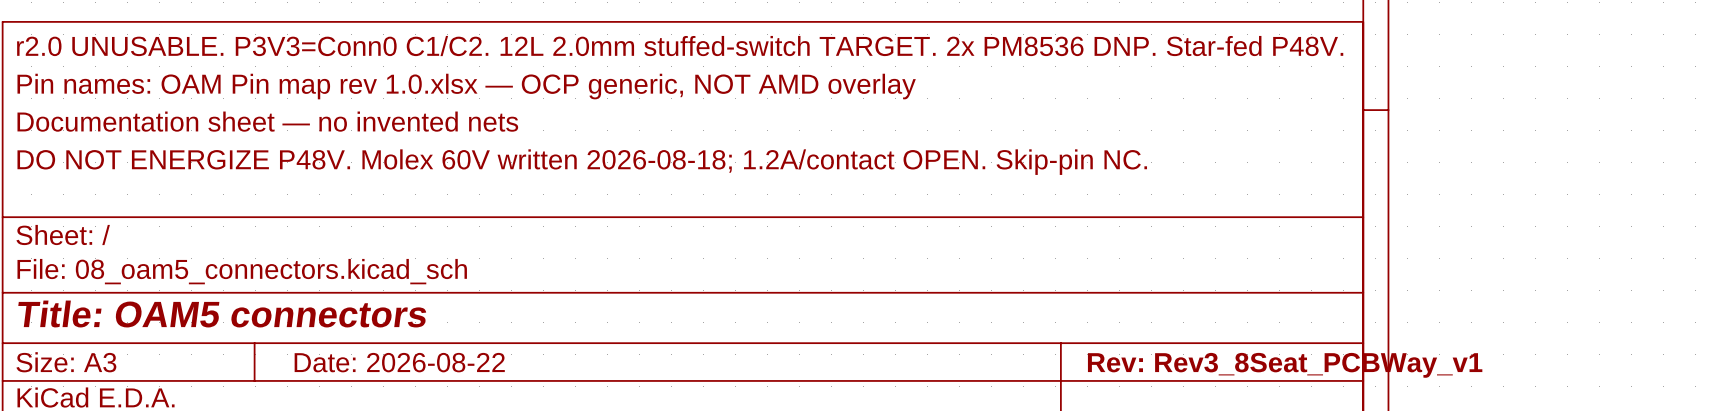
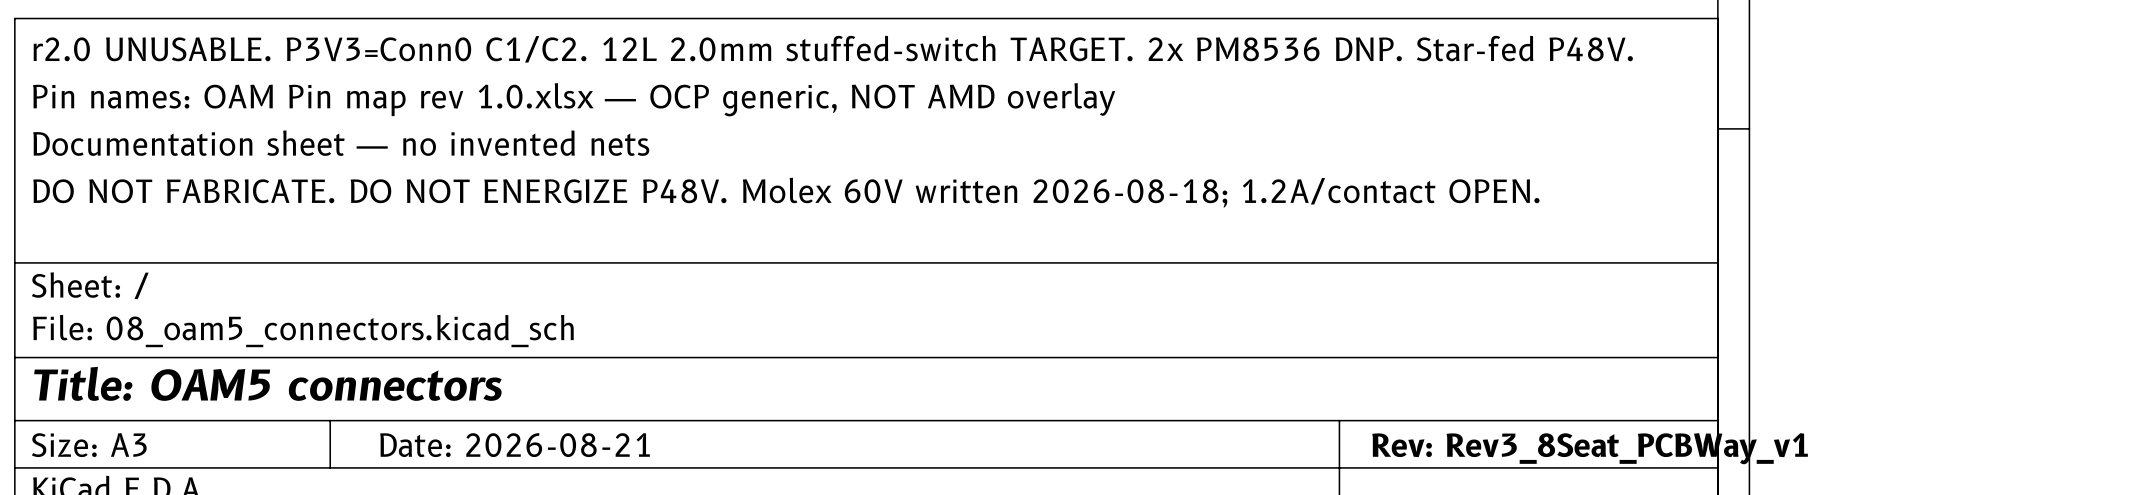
title block: DO NOT ENERGIZE P48V. Molex 60V written 2026-08-18; 1.2A/contact OPEN. Skip-pin NC. (582, 162) -> DO NOT FABRICATE. DO NOT ENERGIZE P48V. Molex 60V written 2026-08-18; 1.2A/contact OPEN. (786, 192)
title block: Date: 2026-08-22 (399, 362) -> Date: 2026-08-21 (515, 445)

